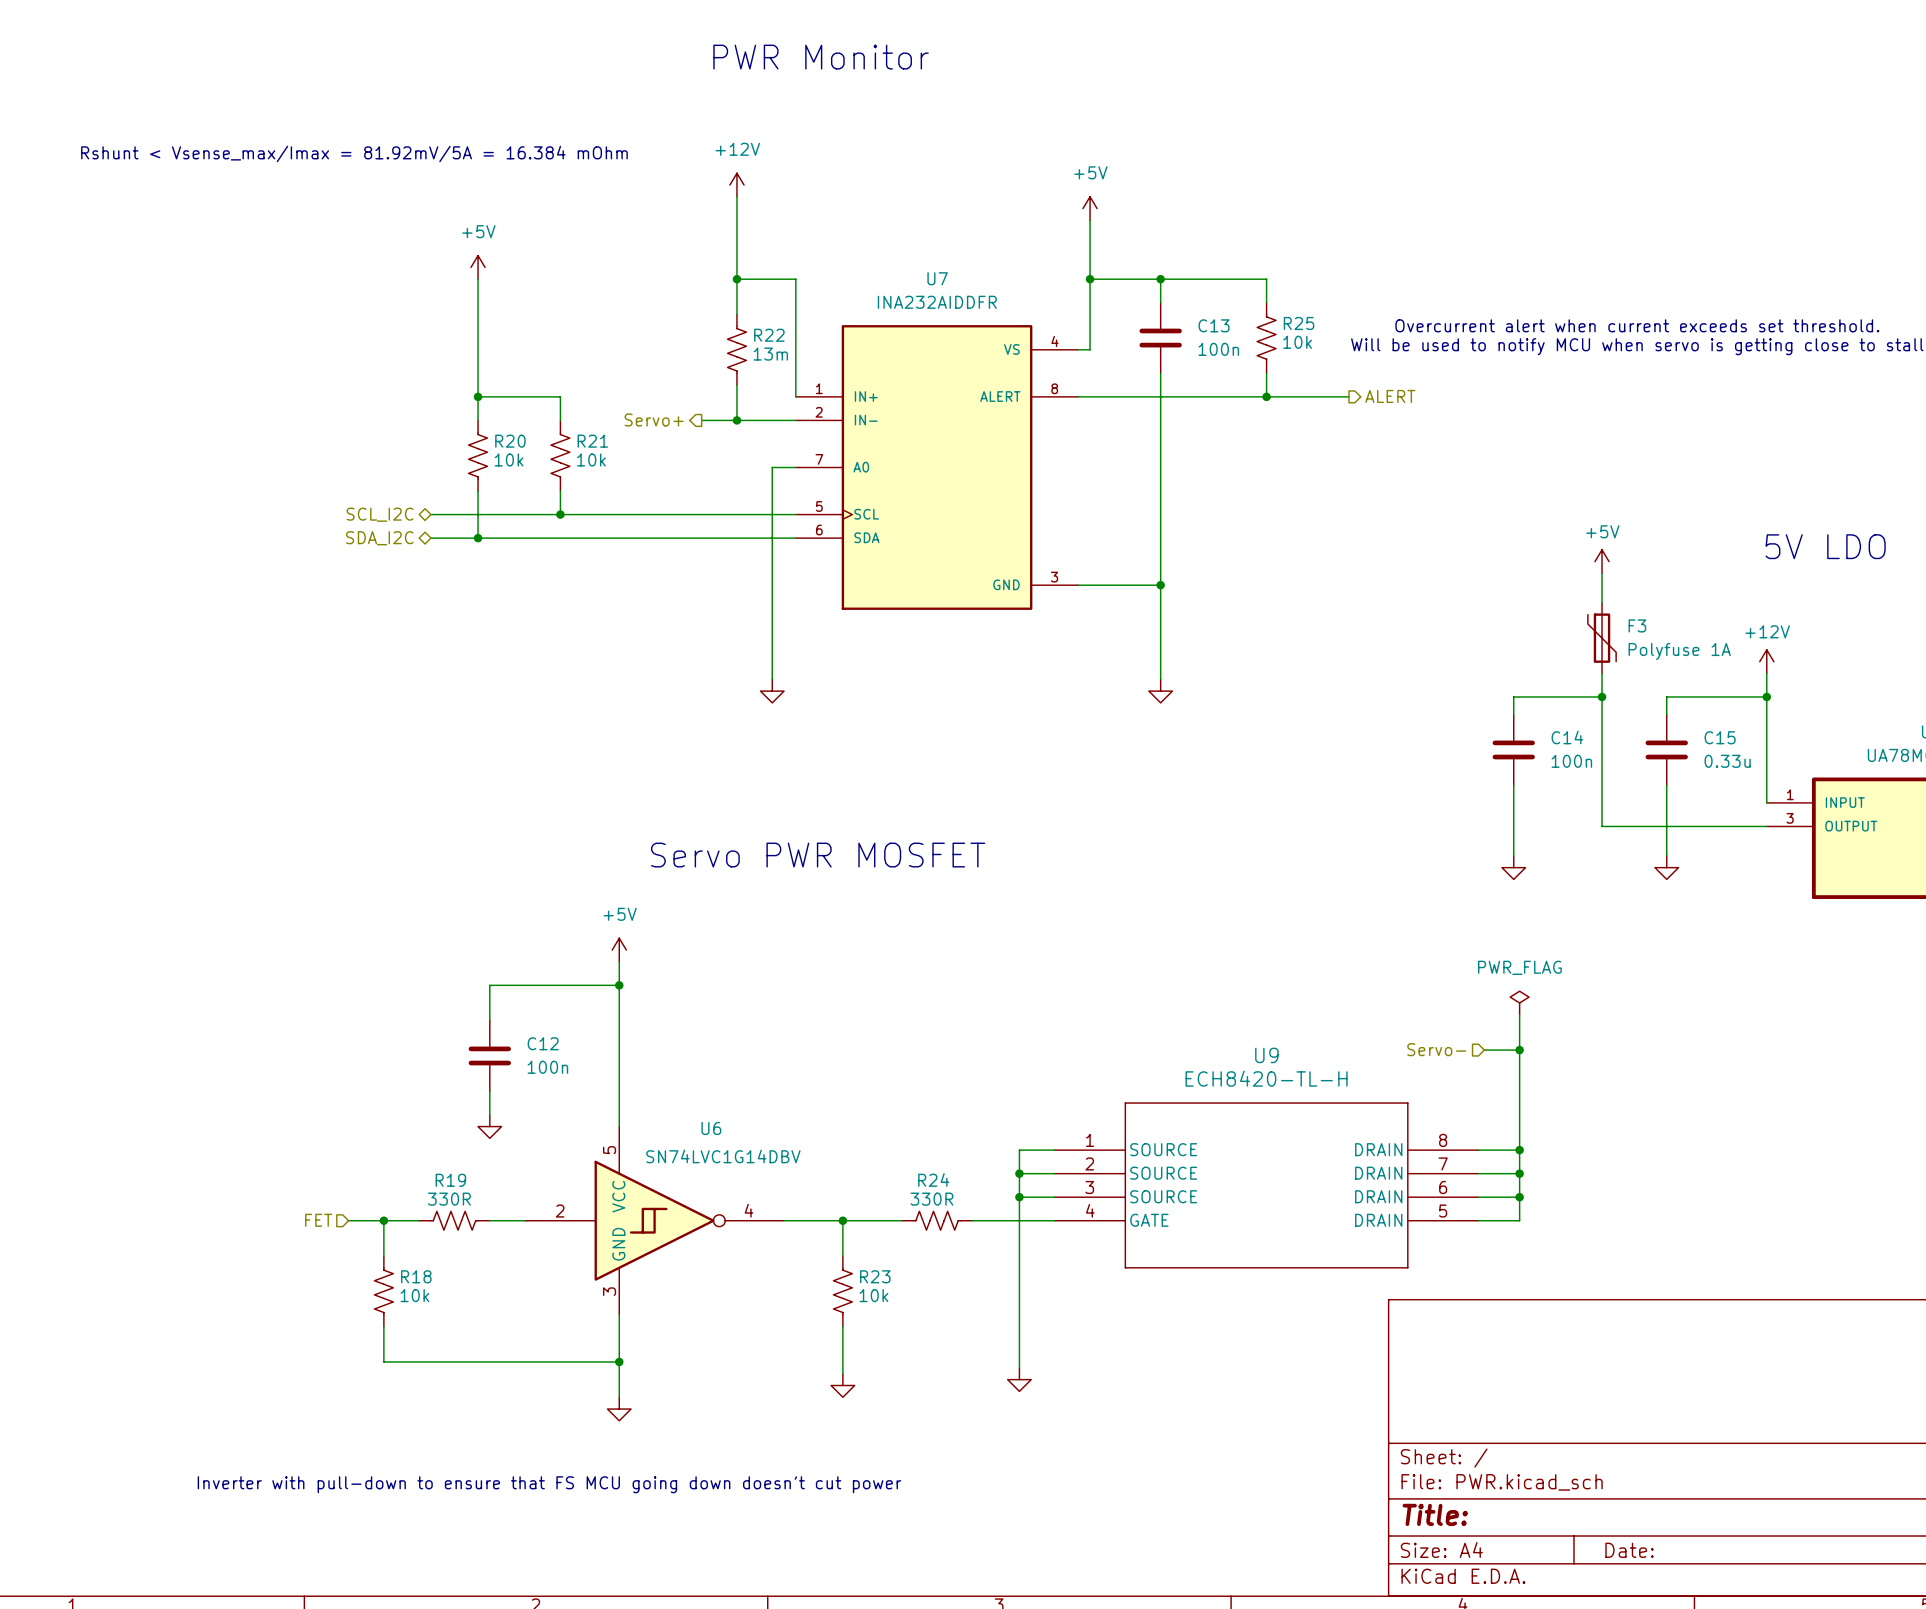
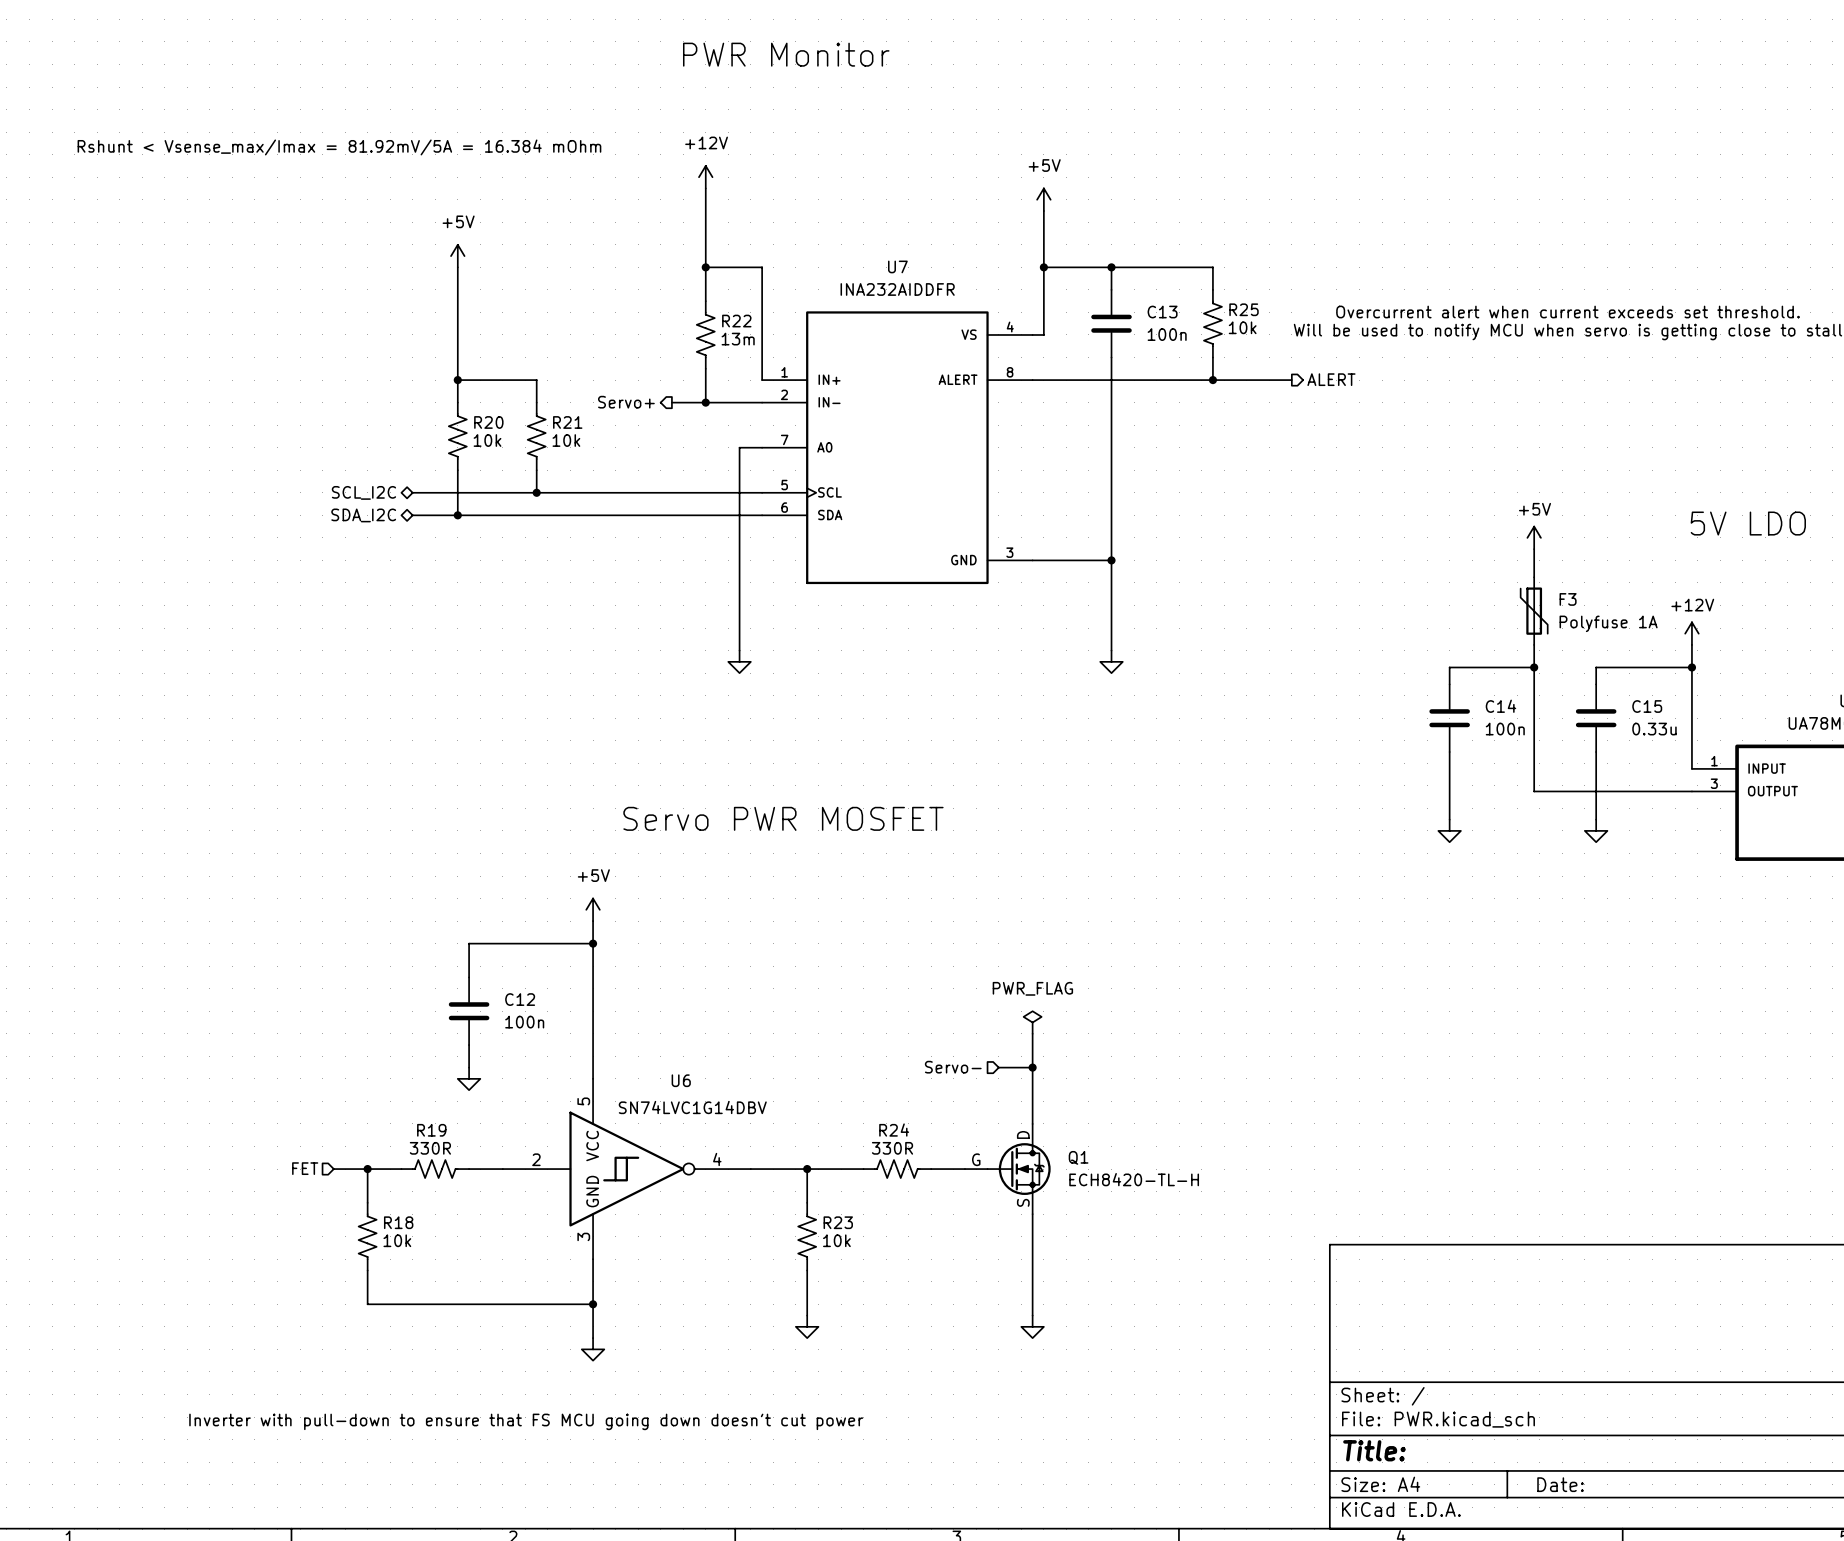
power symbol: PWR_FLAG (1519, 1003) -> none
wire: (1519, 1014) (1519, 1220) (1478, 1220) -> none
hierarchical label: Servo- (1436, 1049) -> none
wire: (1484, 1050) (1519, 1050) -> none
junction: (1519, 1050) -> none
power symbol: none -> PWR_FLAG (1032, 1022)
wire: none -> (1032, 1033) (1032, 1123)
hierarchical label: none -> Servo- (953, 1067)
junction: none -> (1032, 1067)
wire: (1054, 1150) (1019, 1150) (1019, 1367) -> none
wire: (1478, 1150) (1519, 1150) -> none
junction: (1519, 1150) -> none
wire: (1019, 1173) (1054, 1173) -> (998, 1067) (1032, 1067)
junction: (1019, 1173) -> none
wire: (1478, 1173) (1519, 1173) -> none
junction: (1519, 1173) -> none
U9: ECH8420-TL-H (1266, 1185) -> none
wire: (1019, 1197) (1054, 1197) -> none
junction: (1019, 1197) -> none
wire: (1478, 1197) (1519, 1197) -> none
junction: (1519, 1197) -> none
Q1: none -> ECH8420-TL-H (1007, 1169)
wire: none -> (1032, 1214) (1032, 1315)
power symbol position: (1019, 1379) -> (1032, 1326)

